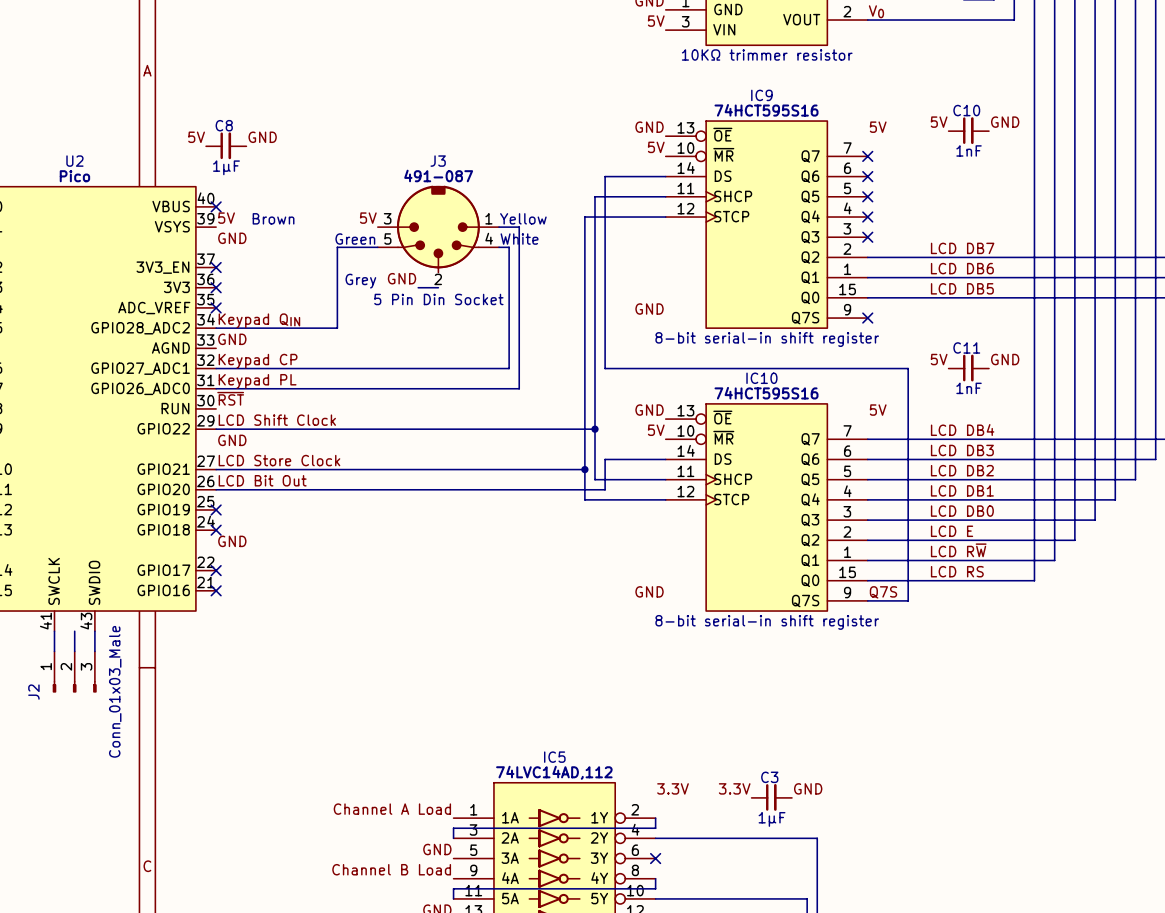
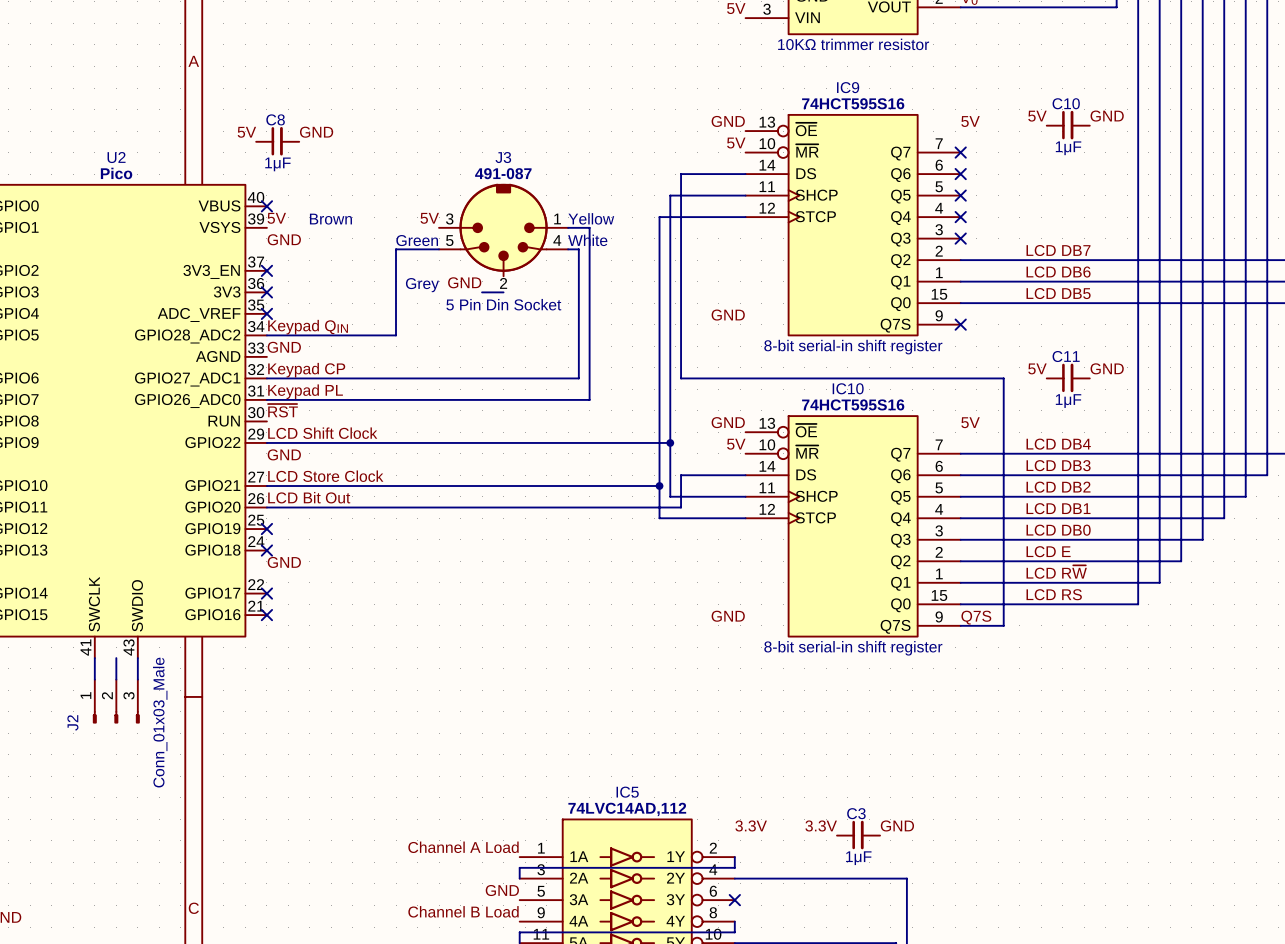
C10 text: 1nF (969, 150) -> none
C10 value: none -> 1μF (1068, 148)
C11 text: 1nF (969, 388) -> none
C11 value: none -> 1μF (1068, 401)

